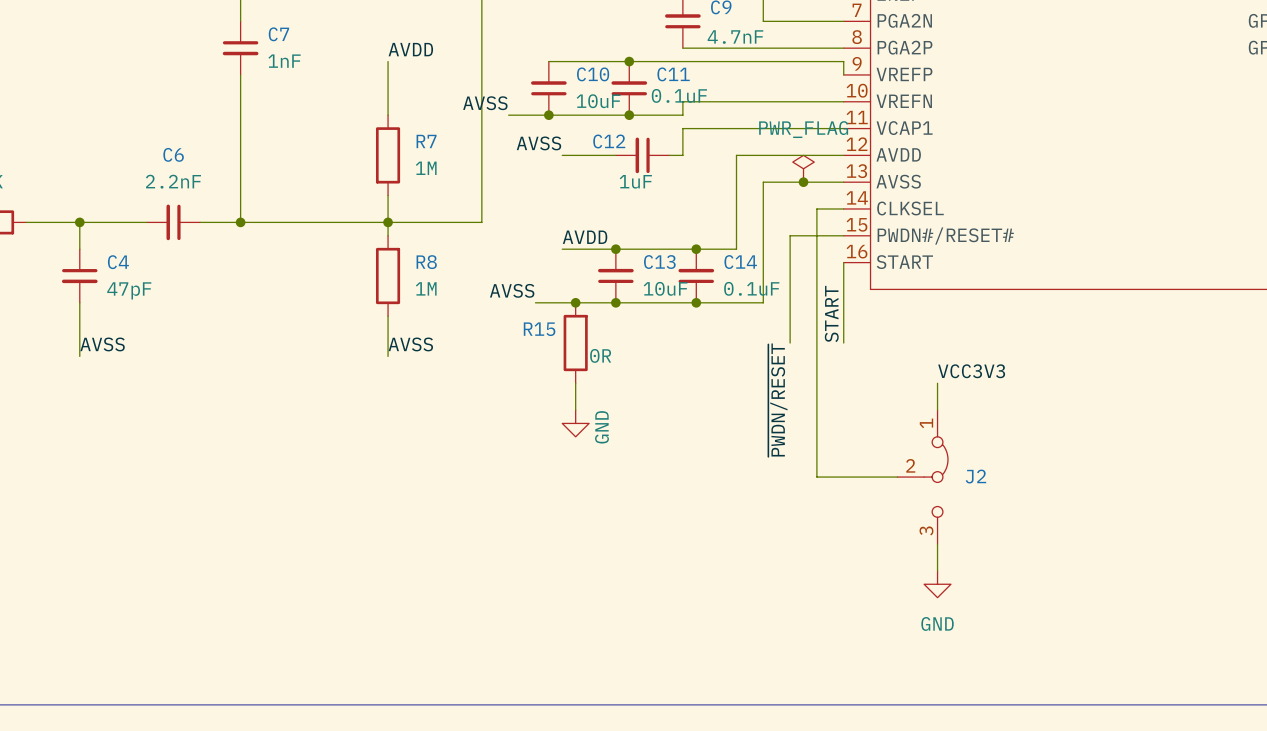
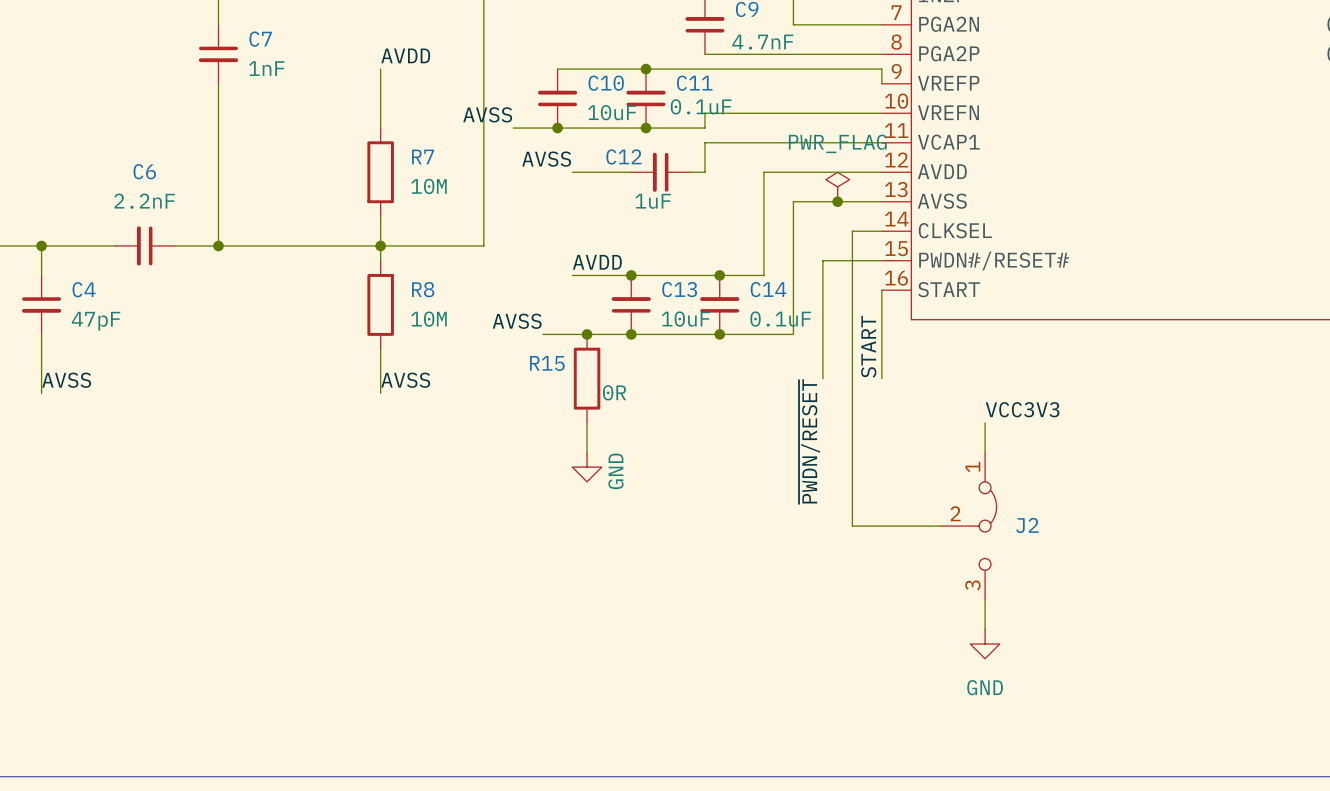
R7 value: 1M (426, 168) -> 10M (428, 186)
R8 value: 1M (426, 288) -> 10M (428, 319)

